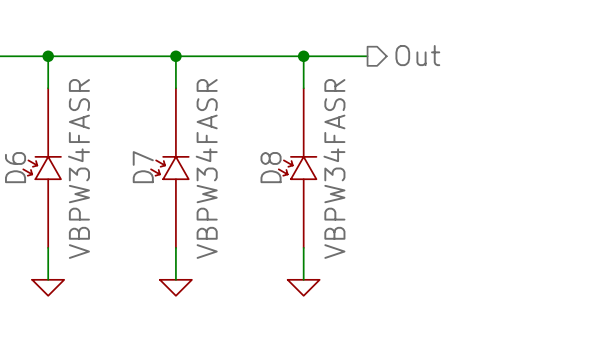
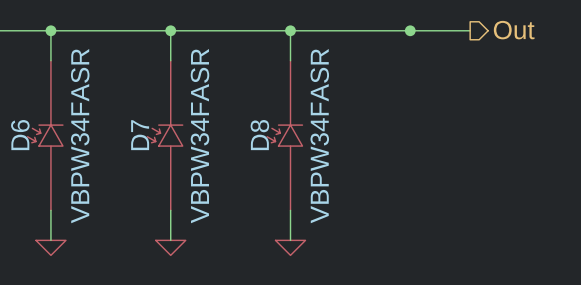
hierarchical label position: Out (417, 55) -> Out (514, 30)
wire: none -> (350, 30) (470, 30)
junction: none -> (410, 30)

